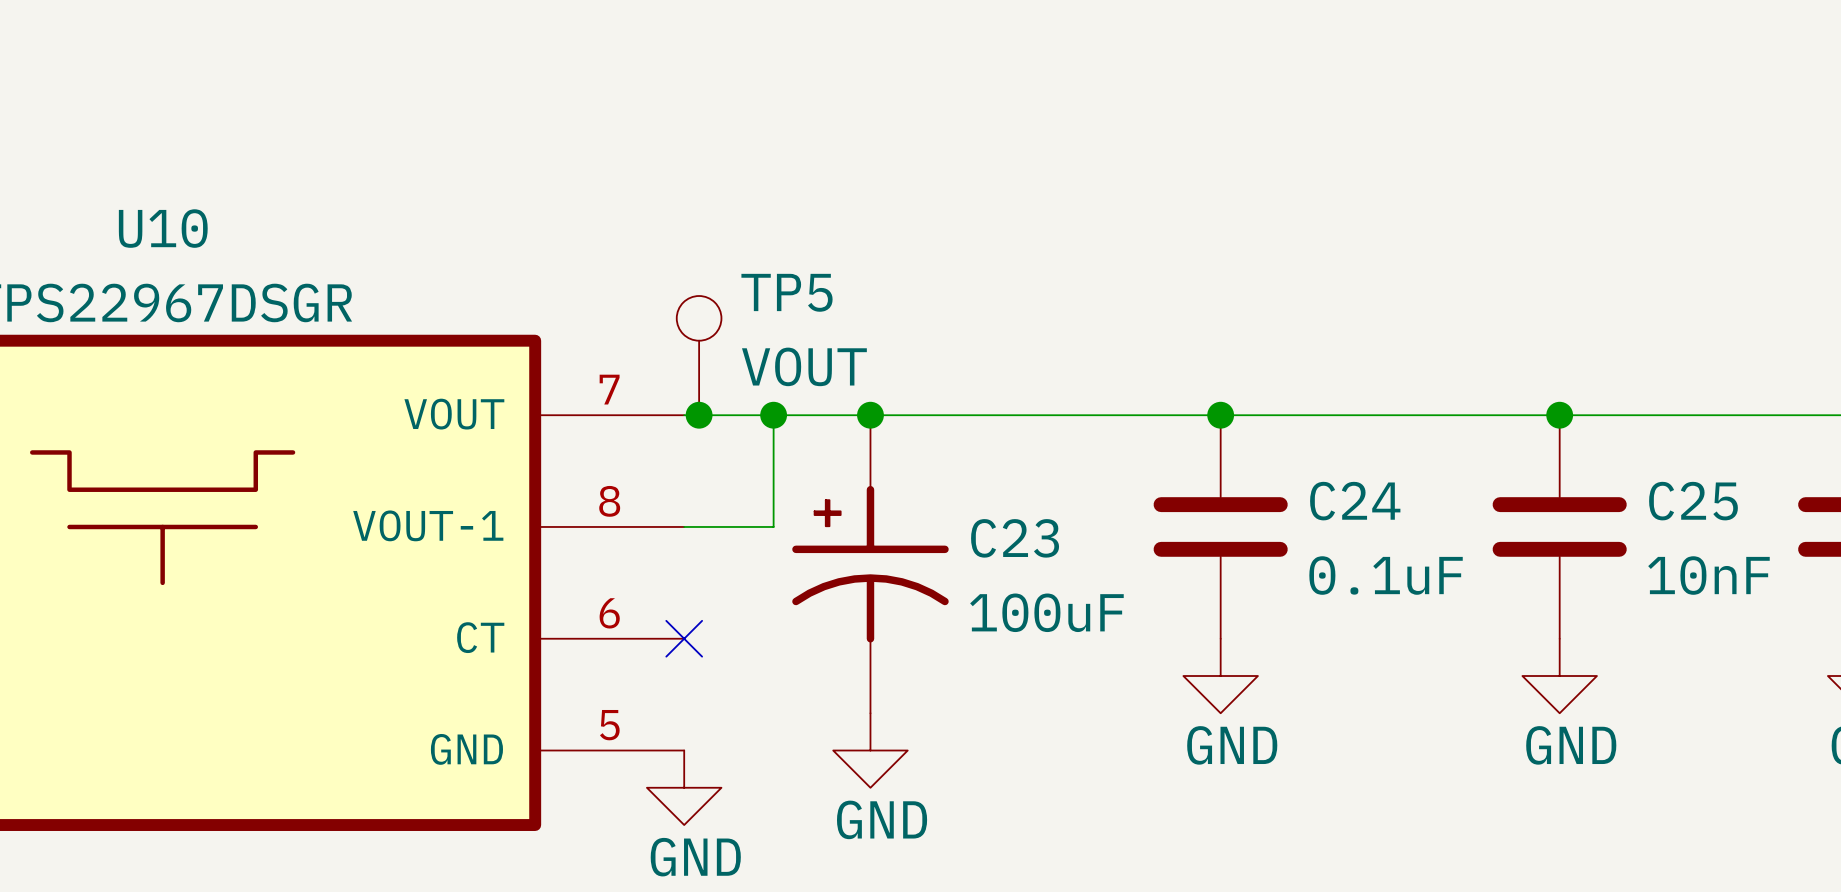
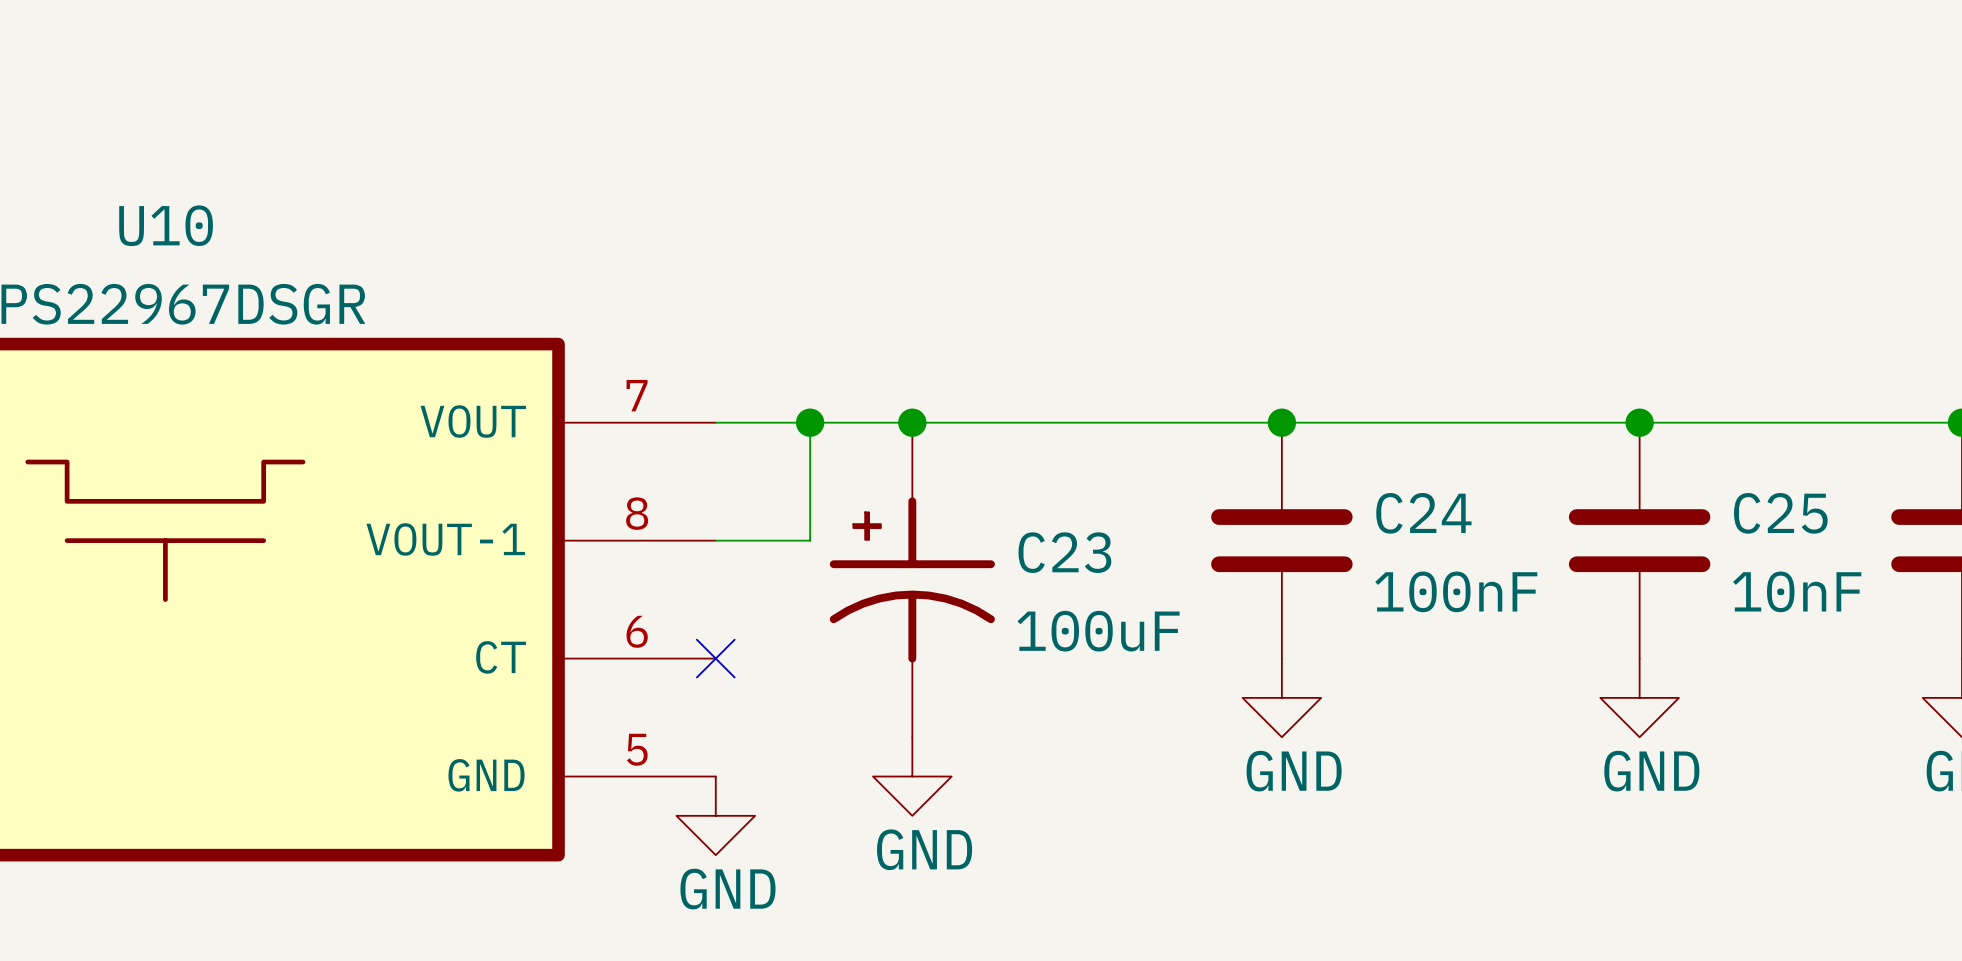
TP5: VOUT (699, 355) -> none
junction: (699, 415) -> none
C24 value: 0.1uF (1386, 575) -> 100nF (1456, 591)

